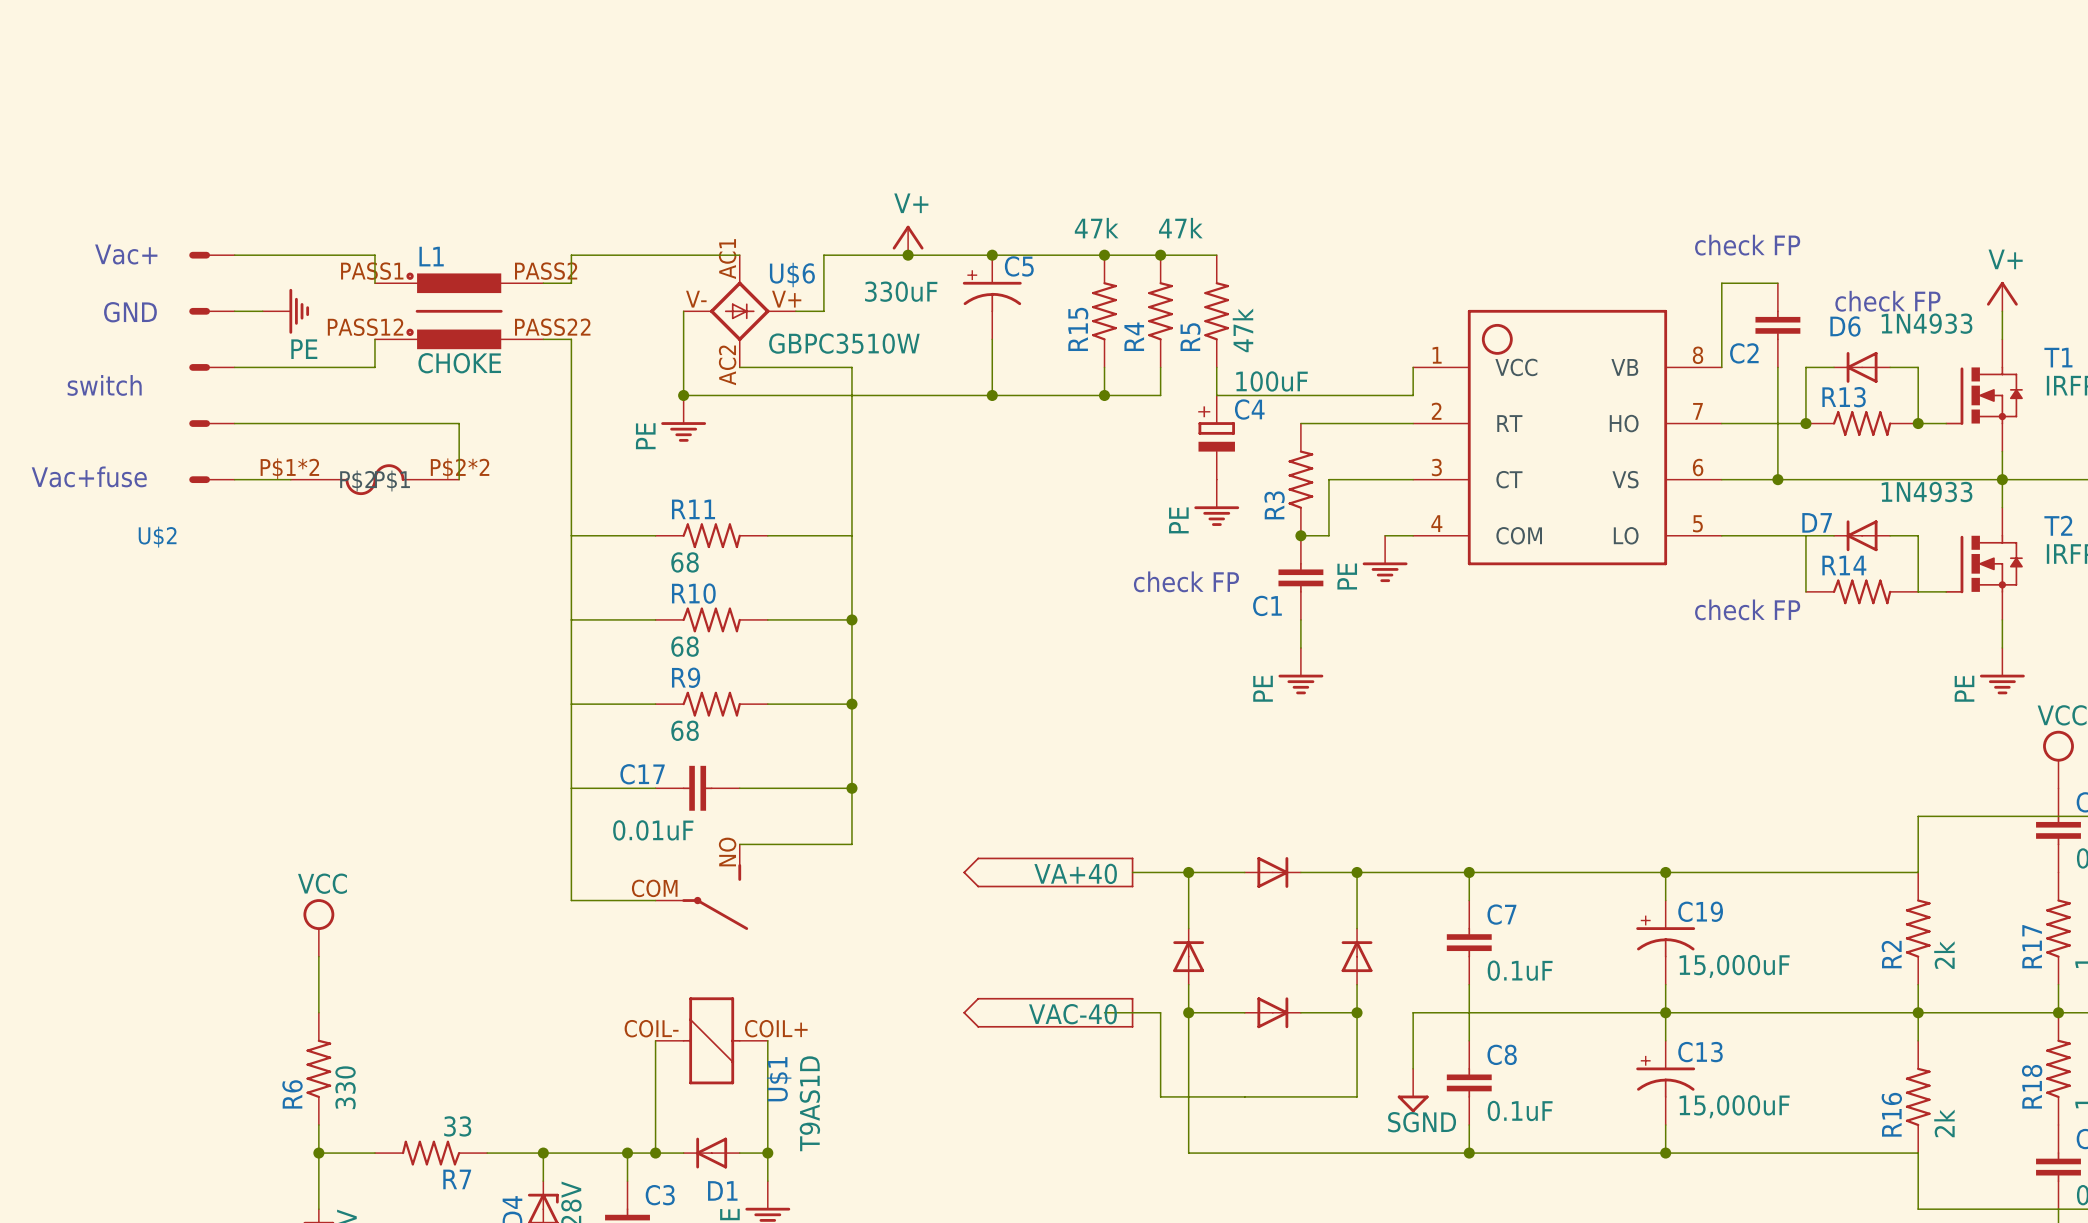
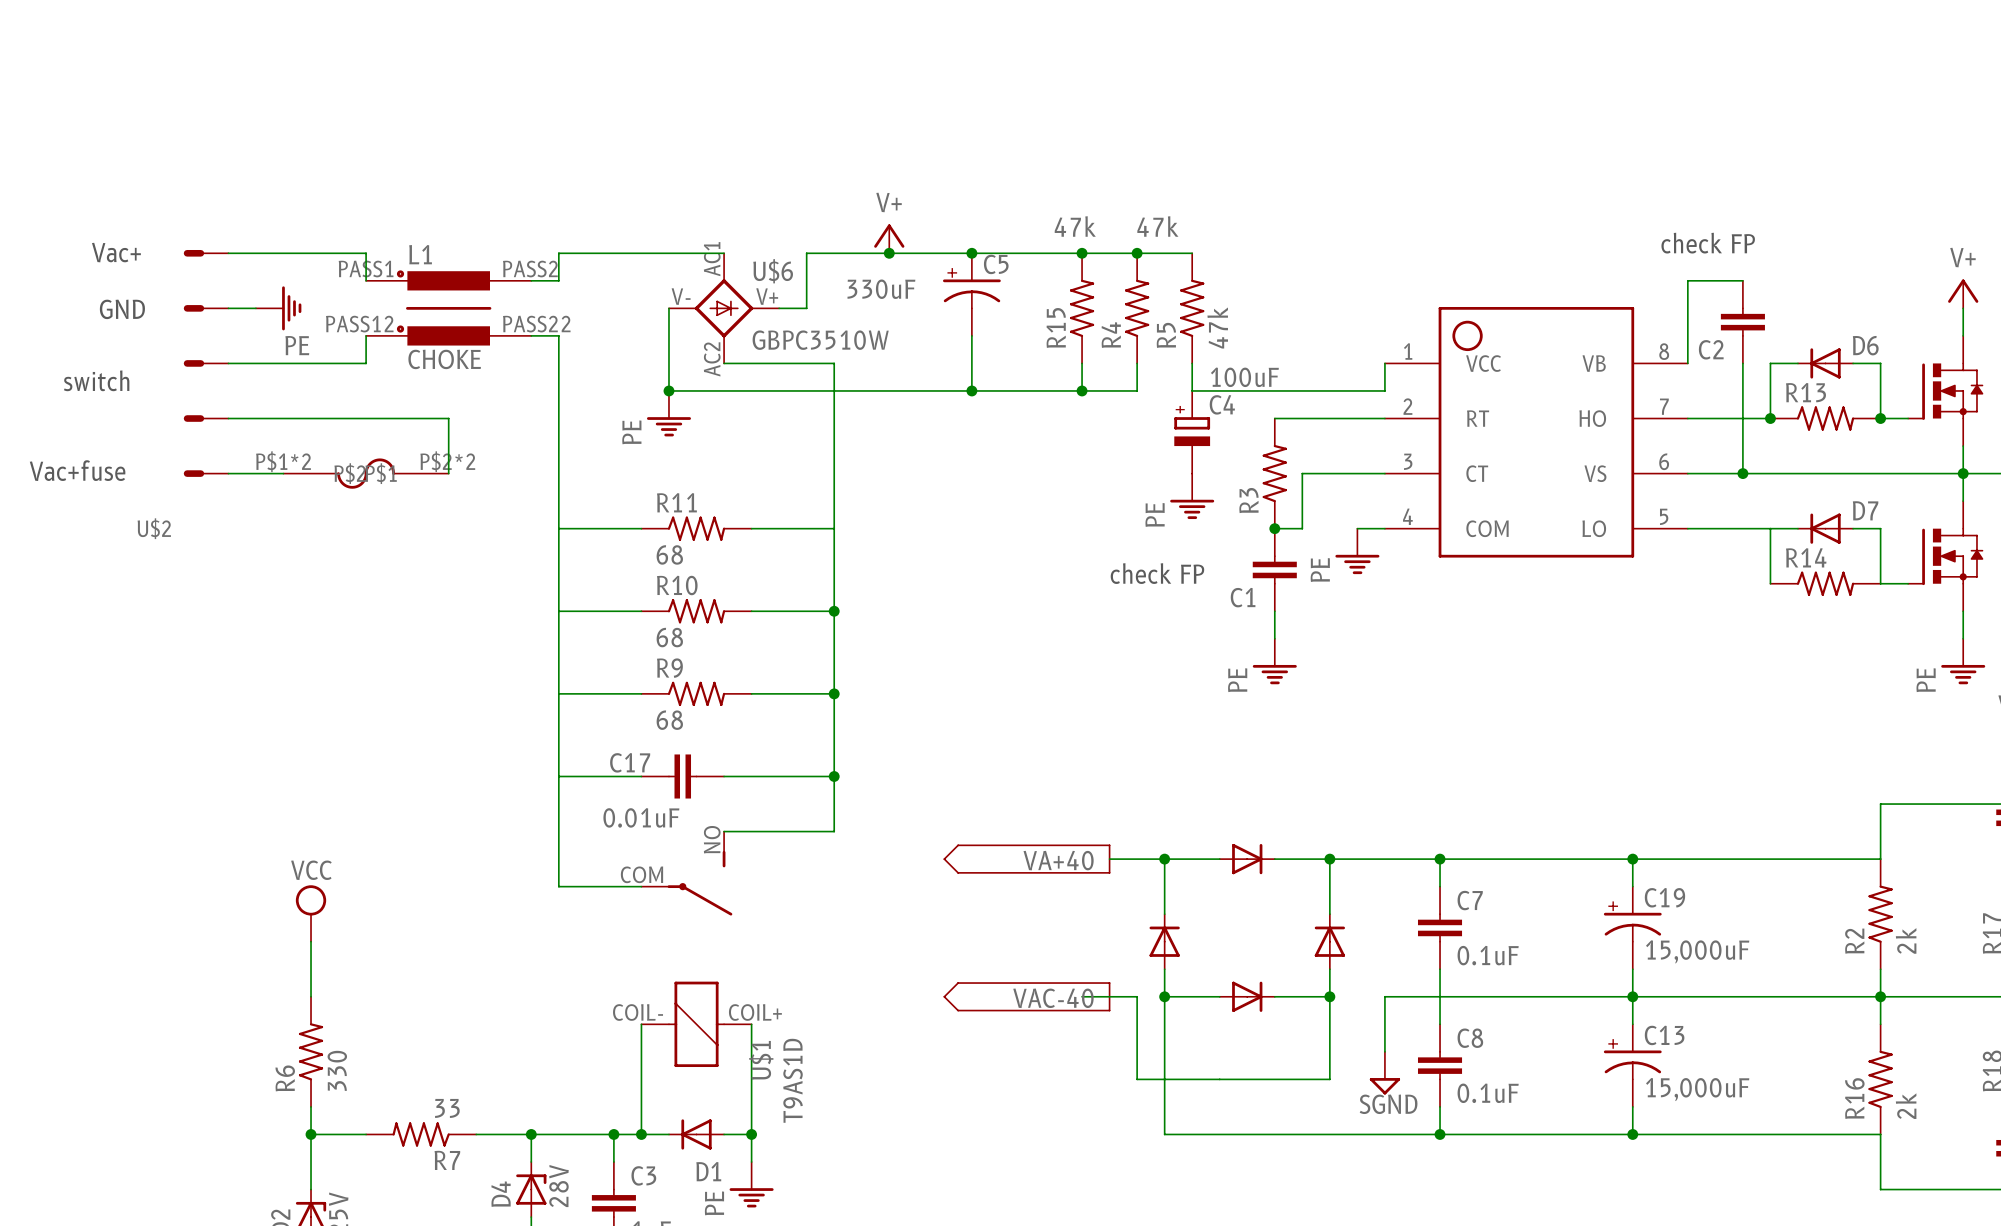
text: check FP (1887, 301) -> none
D6 value: 1N4933 (1927, 323) -> none
D6 name position: D6 (1845, 326) -> D6 (1865, 345)
D7 value: 1N4933 (1927, 492) -> none
D7 name position: D7 (1817, 522) -> D7 (1865, 510)
text: check FP (1747, 609) -> none

